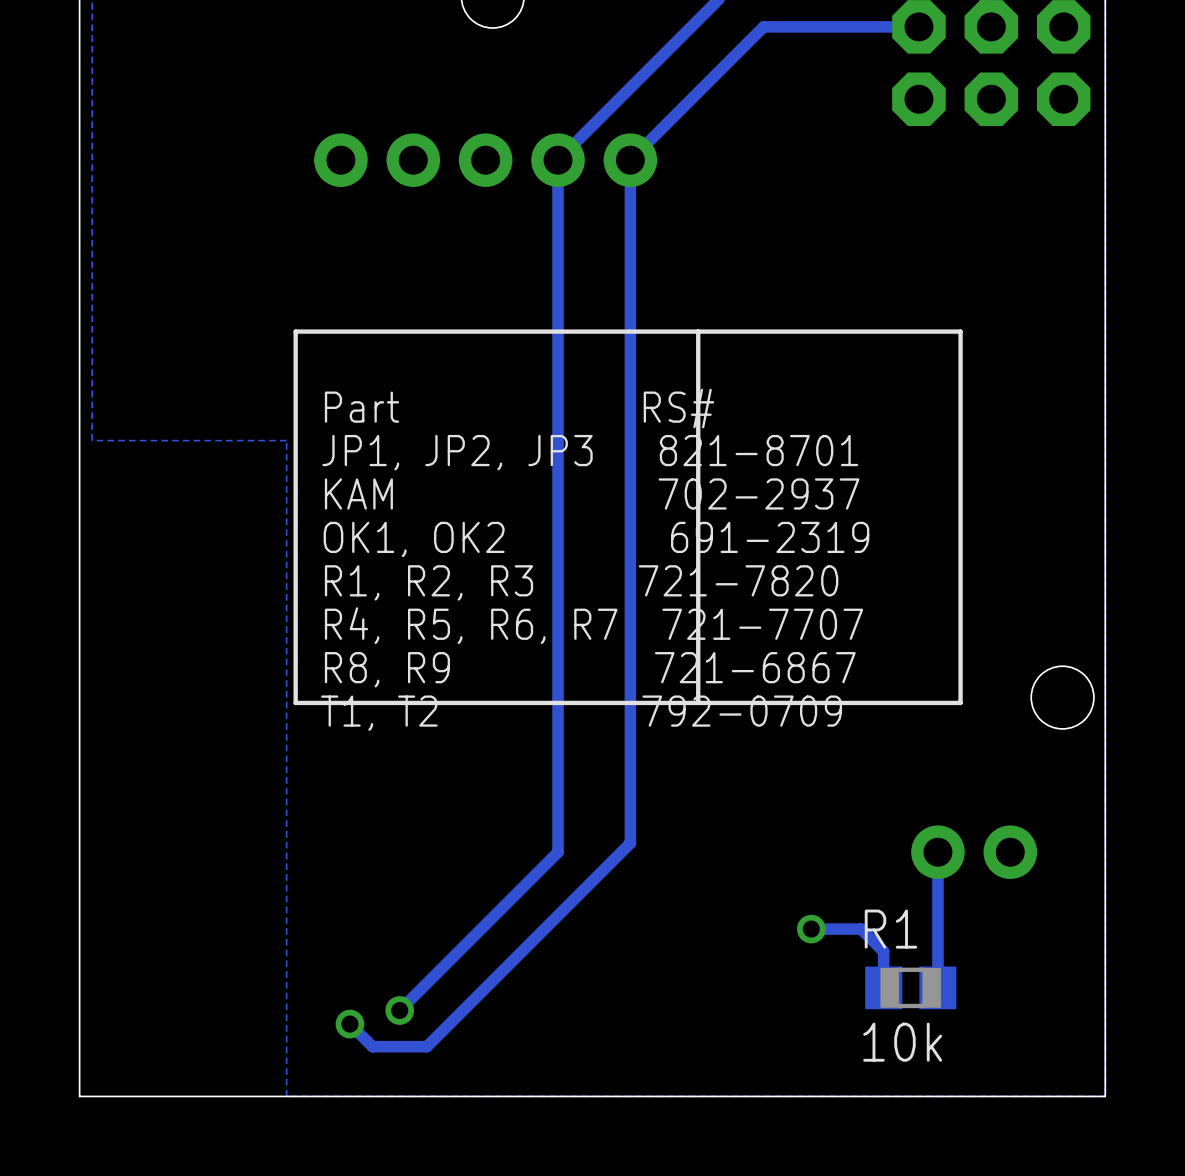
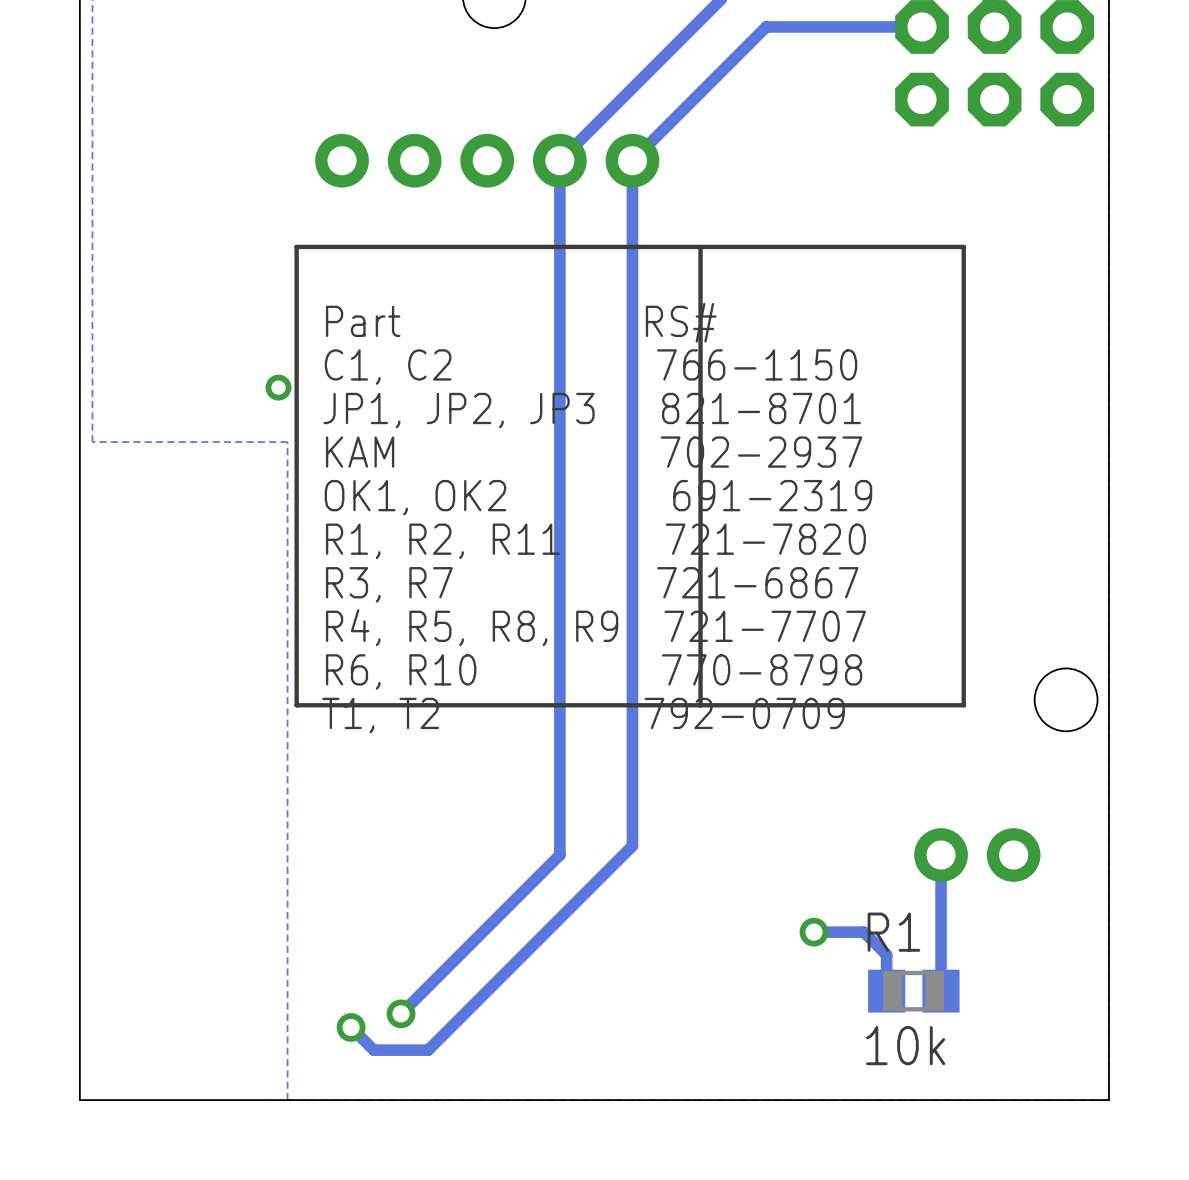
line: none -> (700, 246) (700, 332)
text: none -> Part RS# (521, 322)
line: (960, 331) (295, 331) -> (963, 332) (963, 246) (296, 246) (296, 332)
text: none -> C1, C2 766-1150 (590, 366)
via: none -> (278, 387)
text: Part RS# (519, 408) -> JP1, JP2, JP3 821-8701 (592, 410)
text: JP1, JP2, JP3 821-8701 (590, 452) -> KAM 702-2937 (594, 452)
text: KAM 702-2937 (592, 493) -> OK1, OK2 691-2319 (598, 497)
text: OK1, OK2 691-2319 (596, 539) -> R1, R2, R11 721-7820 (595, 541)
text: R1, R2, R3 721-7820 (581, 582) -> R3, R7 721-6867 (592, 584)
text: R4, R5, R6, R7 721-7707 (593, 625) -> R4, R5, R8, R9 721-7707 (595, 627)
text: R8, R9 721-6867 (590, 669) -> R6, R10 770-8798 (594, 671)

